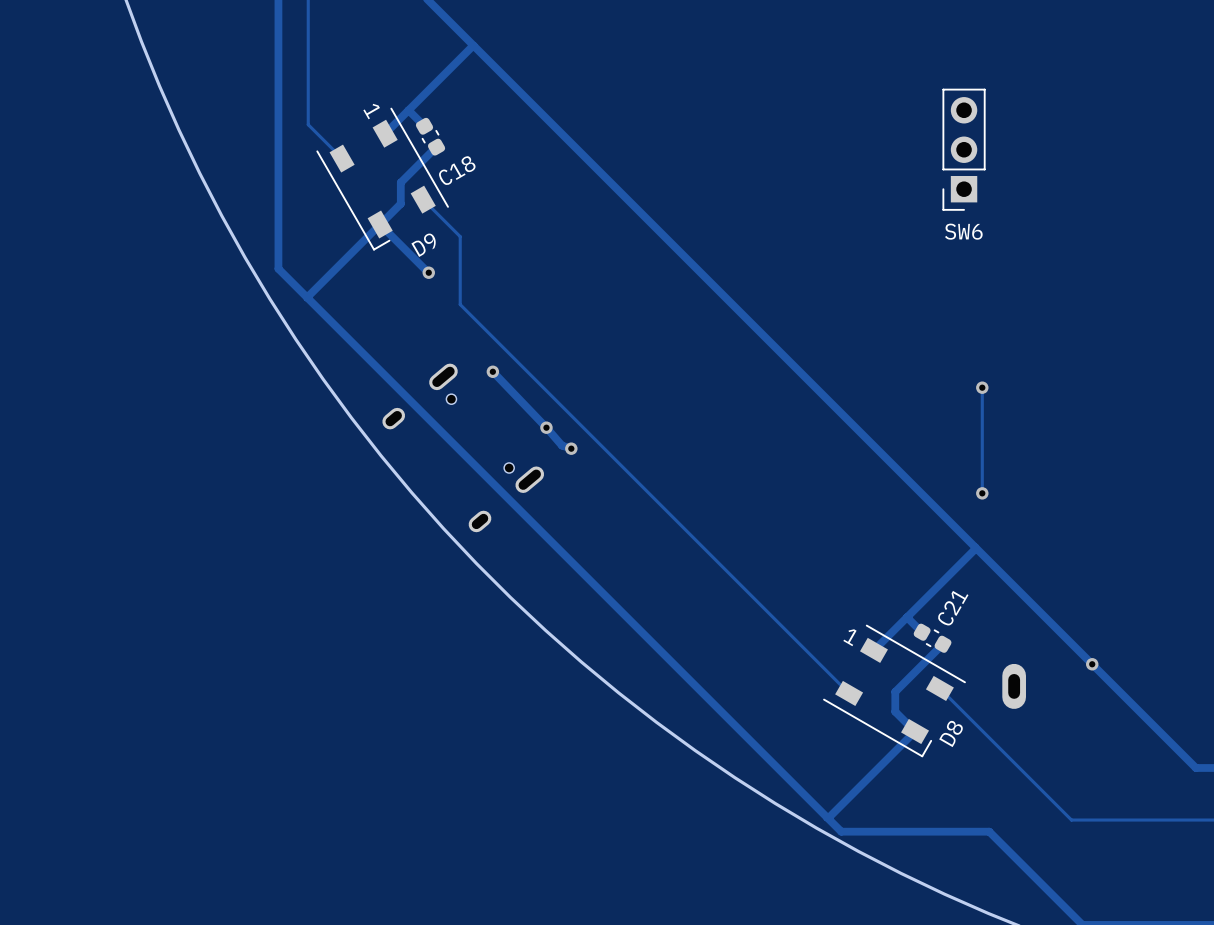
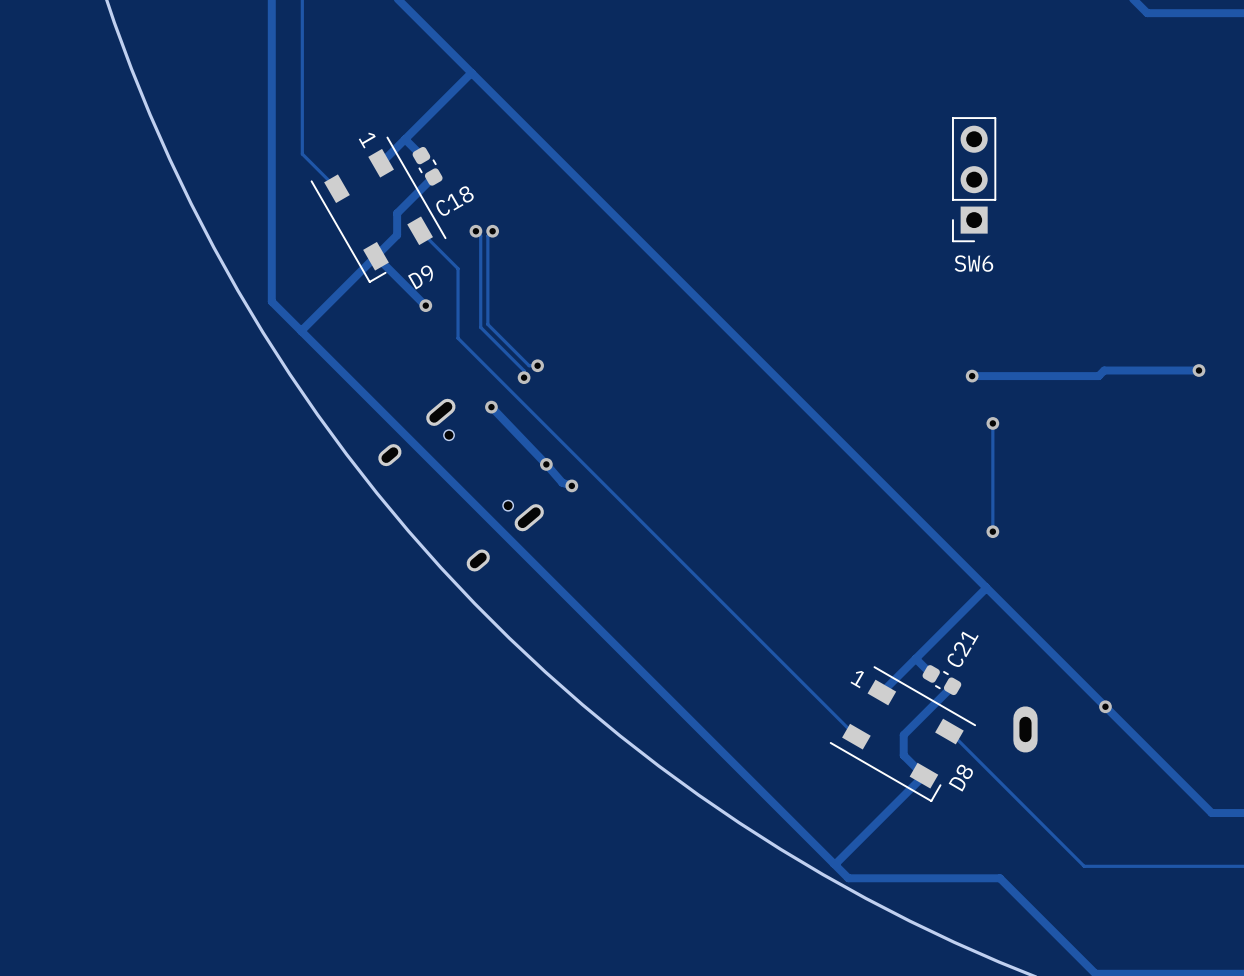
track: none -> (475, 231) (480, 236) (480, 327) (524, 370) (524, 377)
via: none -> (475, 231)
track: none -> (492, 231) (487, 236) (487, 324) (529, 365) (537, 365)
via: none -> (492, 231)
via: none -> (537, 365)
track: none -> (1198, 370) (1104, 370) (1098, 376) (972, 376)
via: none -> (1198, 370)
via: none -> (972, 376)
via: none -> (524, 377)

